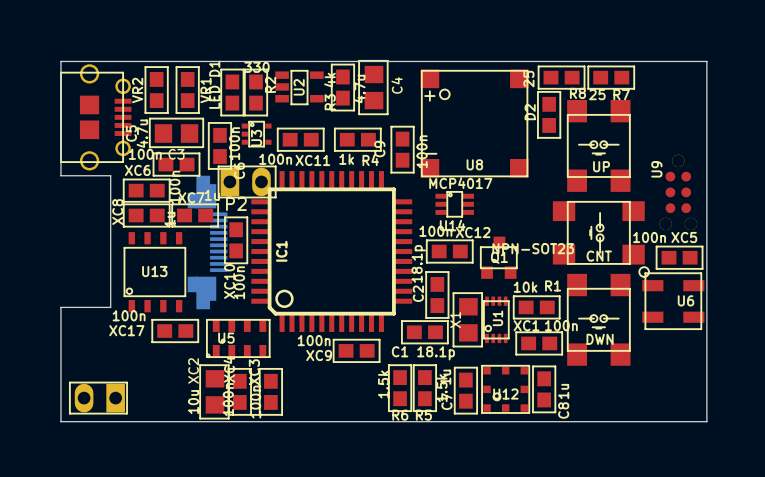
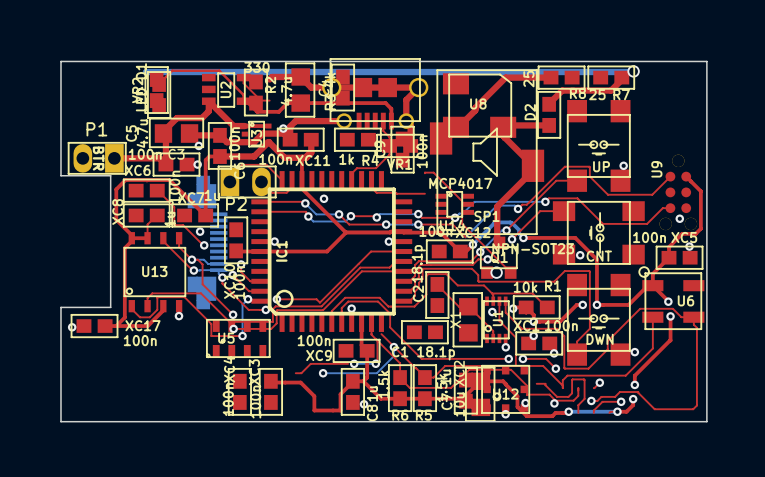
U8 footprint: [420, 69, 529, 178] -> [442, 73, 517, 138]
bottom track: none -> (633, 71) (145, 72)
via: none -> (633, 71)
top track: none -> (243, 77) (243, 83) (260, 100) (269, 100)
top track: none -> (551, 77) (505, 77) (458, 127) (455, 127) (444, 138) (441, 138)
top track: none -> (621, 77) (621, 79) (611, 90) (562, 90) (549, 104)
top track: none -> (269, 79) (272, 76) (300, 76) (311, 87) (418, 87) (406, 99) (406, 121) (410, 125) (410, 145)
top track: none -> (159, 84) (172, 70) (219, 70) (243, 94) (243, 101) (246, 101) (257, 111) (278, 111) (287, 103) (385, 103) (391, 108) (391, 121)
U2 position: (299, 87) -> (226, 90)
C4 position: (373, 87) -> (300, 90)
VR1 rotation: 0° (187, 90) -> 90° clockwise (400, 145)
VR1 position: (187, 90) -> (400, 145)
D1 position: (232, 92) -> (159, 95)
top track: none -> (208, 101) (233, 126) (268, 126)
top track: none -> (208, 101) (208, 111) (201, 118) (176, 118) (163, 131) (165, 136) (165, 164) (159, 158) (114, 158)
part rotation: 0° (95, 117) -> 90° clockwise (375, 93)
part position: (95, 117) -> (375, 93)
top track: none -> (383, 121) (383, 131) (389, 137) (389, 154) (375, 168) (357, 168) (351, 173) (351, 180)
top track: none -> (339, 125) (344, 121) (295, 121) (290, 126) (290, 139)
top track: none -> (549, 125) (505, 125) (503, 127)
top track: none -> (503, 127) (503, 136) (532, 165) (532, 170) (497, 206) (497, 240) (499, 242)
via: none -> (283, 128)
top track: none -> (189, 133) (191, 135) (219, 135) (226, 142) (254, 142) (262, 133) (284, 133) (290, 139)
via: none -> (198, 145)
SP1: none -> (487, 152)
top track: none -> (284, 157) (306, 157) (311, 152) (311, 139) (311, 148) (301, 157)
top track: none -> (284, 157) (269, 142) (254, 156) (209, 156) (205, 160) (205, 215)
top track: none -> (302, 157) (301, 188) (345, 232) (402, 231)
P1: none -> (97, 158)
text: none -> BTR (98, 158)
via: none -> (197, 164)
U8 name position: U8 (474, 164) -> U8 (478, 103)
via: none -> (623, 165)
top track: none -> (424, 173) (433, 172) (462, 201) (462, 223) (510, 272)
top track: none -> (670, 176) (652, 194) (607, 194) (589, 176) (589, 166) (564, 166) (526, 204) (522, 204) (518, 208)
top track: none -> (686, 176) (700, 191) (700, 228) (695, 233) (682, 233) (669, 247) (669, 257) (652, 273) (652, 285)
top track: none -> (282, 180) (266, 164) (242, 164) (229, 176) (229, 181)
top track: none -> (292, 180) (292, 187) (286, 192) (272, 192) (261, 181)
top track: none -> (371, 180) (371, 187) (376, 192) (424, 193)
top track: none -> (577, 180) (556, 180) (506, 230)
top track: none -> (157, 190) (174, 207) (174, 224) (183, 225) (204, 245)
via: none -> (324, 198)
top track: none -> (260, 201) (306, 201) (305, 203)
top track: none -> (545, 201) (548, 198) (577, 198) (603, 223) (647, 223) (662, 208) (670, 208)
bottom track: none -> (545, 201) (474, 201) (462, 213) (459, 213) (455, 217)
via: none -> (545, 201)
bottom track: none -> (305, 203) (316, 214) (339, 214)
via: none -> (305, 203)
bottom track: none -> (518, 208) (514, 205) (496, 205) (465, 237)
via: none -> (518, 208)
top track: none -> (260, 211) (306, 211) (308, 216)
top track: none -> (564, 211) (540, 211) (512, 239)
top track: none -> (339, 214) (349, 224) (386, 224)
via: none -> (339, 214)
top track: none -> (418, 214) (422, 217) (455, 217)
bottom track: none -> (418, 214) (380, 214) (376, 217)
via: none -> (418, 214)
top track: none -> (157, 215) (147, 224) (147, 238) (131, 238)
top track: none -> (205, 215) (169, 180) (125, 180) (116, 189) (116, 219) (131, 235) (131, 241) (124, 248) (124, 317) (116, 326)
via: none -> (308, 216)
top track: none -> (350, 216) (376, 217)
bottom track: none -> (350, 216) (345, 221) (313, 221) (308, 216)
via: none -> (350, 216)
via: none -> (376, 217)
via: none -> (455, 217)
via: none -> (679, 218)
bottom track: none -> (386, 224) (418, 224)
via: none -> (386, 224)
top track: none -> (418, 224) (452, 224) (465, 237)
via: none -> (418, 224)
bottom track: none -> (506, 230) (501, 230) (480, 252)
via: none -> (506, 230)
via: none -> (200, 231)
top track: none -> (402, 231) (440, 232) (459, 251) (466, 251) (472, 244)
top track: none -> (345, 232) (327, 251) (236, 250)
top track: none -> (523, 237) (575, 237) (596, 259) (596, 304) (628, 304) (647, 285) (652, 285)
bottom track: none -> (523, 237) (512, 223) (495, 222) (472, 244)
via: none -> (523, 237)
top track: none -> (163, 238) (163, 241) (193, 270)
top track: none -> (179, 238) (179, 246) (191, 259) (197, 259) (202, 264) (202, 284) (233, 314)
via: none -> (512, 239)
via: none -> (274, 241)
via: none -> (388, 241)
via: none -> (472, 244)
via: none -> (204, 245)
via: none -> (689, 246)
top track: none -> (402, 251) (371, 251) (319, 302) (316, 299) (276, 299)
top track: none -> (480, 252) (471, 261) (418, 261) (415, 265) (415, 275) (409, 281) (402, 281)
via: none -> (480, 252)
via: none -> (580, 255)
bottom track: none -> (191, 259) (203, 259) (208, 263) (218, 263)
via: none -> (191, 259)
top track: none -> (487, 259) (478, 259) (472, 264) (431, 264)
via: none -> (487, 259)
top track: none -> (402, 261) (395, 261) (389, 267) (360, 267) (321, 306) (275, 306) (272, 309) (272, 321) (229, 321) (200, 293) (152, 293) (147, 298) (147, 306)
top track: none -> (241, 264) (241, 272) (250, 281) (260, 281)
via: none -> (241, 264)
top track: none -> (431, 264) (420, 264) (418, 277) (415, 281) (415, 286) (409, 291) (402, 291)
bottom track: none -> (193, 270) (218, 270) (218, 273) (222, 277)
via: none -> (193, 270)
top track: none -> (402, 271) (361, 271) (323, 310) (277, 310) (276, 323) (271, 328) (233, 328)
via: none -> (496, 272)
top track: none -> (232, 275) (249, 291) (260, 291)
via: none -> (232, 275)
top track: none -> (222, 277) (222, 283) (248, 309) (265, 309)
via: none -> (222, 277)
top track: none -> (437, 284) (459, 306) (469, 306) (493, 331) (493, 338)
top track: none -> (652, 285) (668, 301)
top track: none -> (492, 293) (532, 293) (547, 307)
bottom track: none -> (248, 299) (242, 304) (242, 336)
via: none -> (248, 299)
via: none -> (276, 299)
top track: none -> (402, 301) (409, 301) (415, 295) (418, 282) (422, 279) (422, 268) (471, 268) (478, 275) (478, 281) (554, 281) (564, 271) (589, 271) (589, 328) (577, 341) (577, 354)
top track: none -> (493, 301) (493, 294) (484, 285) (457, 285) (446, 274) (428, 274) (426, 275) (426, 294) (414, 306) (388, 306) (379, 297) (345, 297) (331, 311) (331, 322)
top track: none -> (499, 301) (499, 321) (515, 337) (515, 365)
top track: none -> (505, 301) (505, 312) (521, 328) (557, 328) (564, 336) (564, 368) (588, 368) (607, 349) (607, 341) (640, 308) (672, 308) (681, 317) (693, 317) (693, 324) (696, 327) (696, 405) (693, 409) (654, 409) (638, 392) (619, 392) (615, 396) (601, 396) (597, 400) (591, 400)
via: none -> (668, 301)
top track: none -> (582, 304) (576, 304) (559, 321) (533, 321) (533, 315) (526, 307) (513, 308)
via: none -> (582, 304)
via: none -> (596, 304)
top track: none -> (131, 306) (131, 309) (139, 317) (149, 317) (157, 309) (157, 297) (184, 297) (211, 323) (211, 336) (242, 336)
top track: none -> (163, 306) (163, 310) (147, 326) (105, 326) (146, 326) (163, 309) (163, 306)
via: none -> (351, 308)
via: none -> (513, 308)
via: none -> (265, 309)
via: none -> (492, 312)
via: none -> (233, 314)
XC17 value position: 100n (129, 315) -> 100n (140, 340)
top track: none -> (371, 315) (371, 334) (400, 363) (400, 378) (409, 387) (451, 387) (469, 369) (511, 369) (527, 385) (527, 395) (549, 394) (555, 400) (573, 400) (578, 395) (578, 388)
via: none -> (178, 316)
top track: none -> (670, 316) (670, 340) (634, 375) (634, 384)
via: none -> (670, 316)
top track: none -> (652, 317) (652, 348) (625, 375) (567, 375) (562, 380) (562, 388)
via: none -> (533, 321)
top track: none -> (341, 322) (341, 308) (348, 301) (378, 301) (390, 313) (390, 327) (421, 358) (508, 358)
top track: none -> (361, 322) (361, 345) (367, 350) (367, 377) (363, 381)
via: none -> (72, 327)
via: none -> (233, 328)
XC17 name position: XC17 (126, 330) -> XC17 (142, 325)
XC17 position: (175, 331) -> (94, 326)
top track: none -> (381, 334) (424, 377) (433, 377) (445, 365) (543, 365) (562, 385)
via: none -> (533, 335)
via: none -> (242, 336)
top track: none -> (377, 340) (377, 362) (375, 363)
bottom track: none -> (393, 347) (393, 356) (376, 373) (323, 373)
via: none -> (393, 347)
via: none -> (505, 347)
via: none -> (634, 352)
via: none -> (554, 353)
via: none -> (508, 358)
top track: none -> (522, 358) (546, 358) (555, 368)
via: none -> (522, 358)
top track: none -> (348, 363) (310, 363) (301, 373) (295, 373)
bottom track: none -> (354, 363) (375, 363)
via: none -> (354, 363)
via: none -> (375, 363)
via: none -> (555, 368)
via: none -> (323, 373)
top track: none -> (363, 381) (380, 398) (463, 398) (480, 381) (503, 381) (517, 396) (517, 406) (526, 416) (552, 416) (555, 412) (568, 411)
top track: none -> (363, 381) (352, 381) (340, 394) (340, 410) (314, 410) (314, 396) (300, 382) (274, 382)
top track: none -> (599, 382) (593, 388)
via: none -> (599, 382)
top track: none -> (536, 383) (545, 383) (557, 396) (568, 396) (572, 393) (572, 379) (584, 379) (584, 398) (578, 405) (578, 412)
via: none -> (634, 384)
C8 position: (544, 389) -> (352, 391)
XC2 position: (214, 391) -> (480, 394)
part: (98, 398) -> none
top track: none -> (633, 399) (633, 405) (626, 411) (609, 412)
via: none -> (633, 399)
via: none -> (591, 400)
top track: none -> (621, 401) (602, 401) (593, 410) (593, 412)
via: none -> (621, 401)
via: none -> (525, 403)
via: none -> (554, 403)
via: none -> (364, 404)
bottom track: none -> (568, 411) (617, 411)
via: none -> (568, 411)
via: none -> (617, 411)
via: none -> (505, 414)

